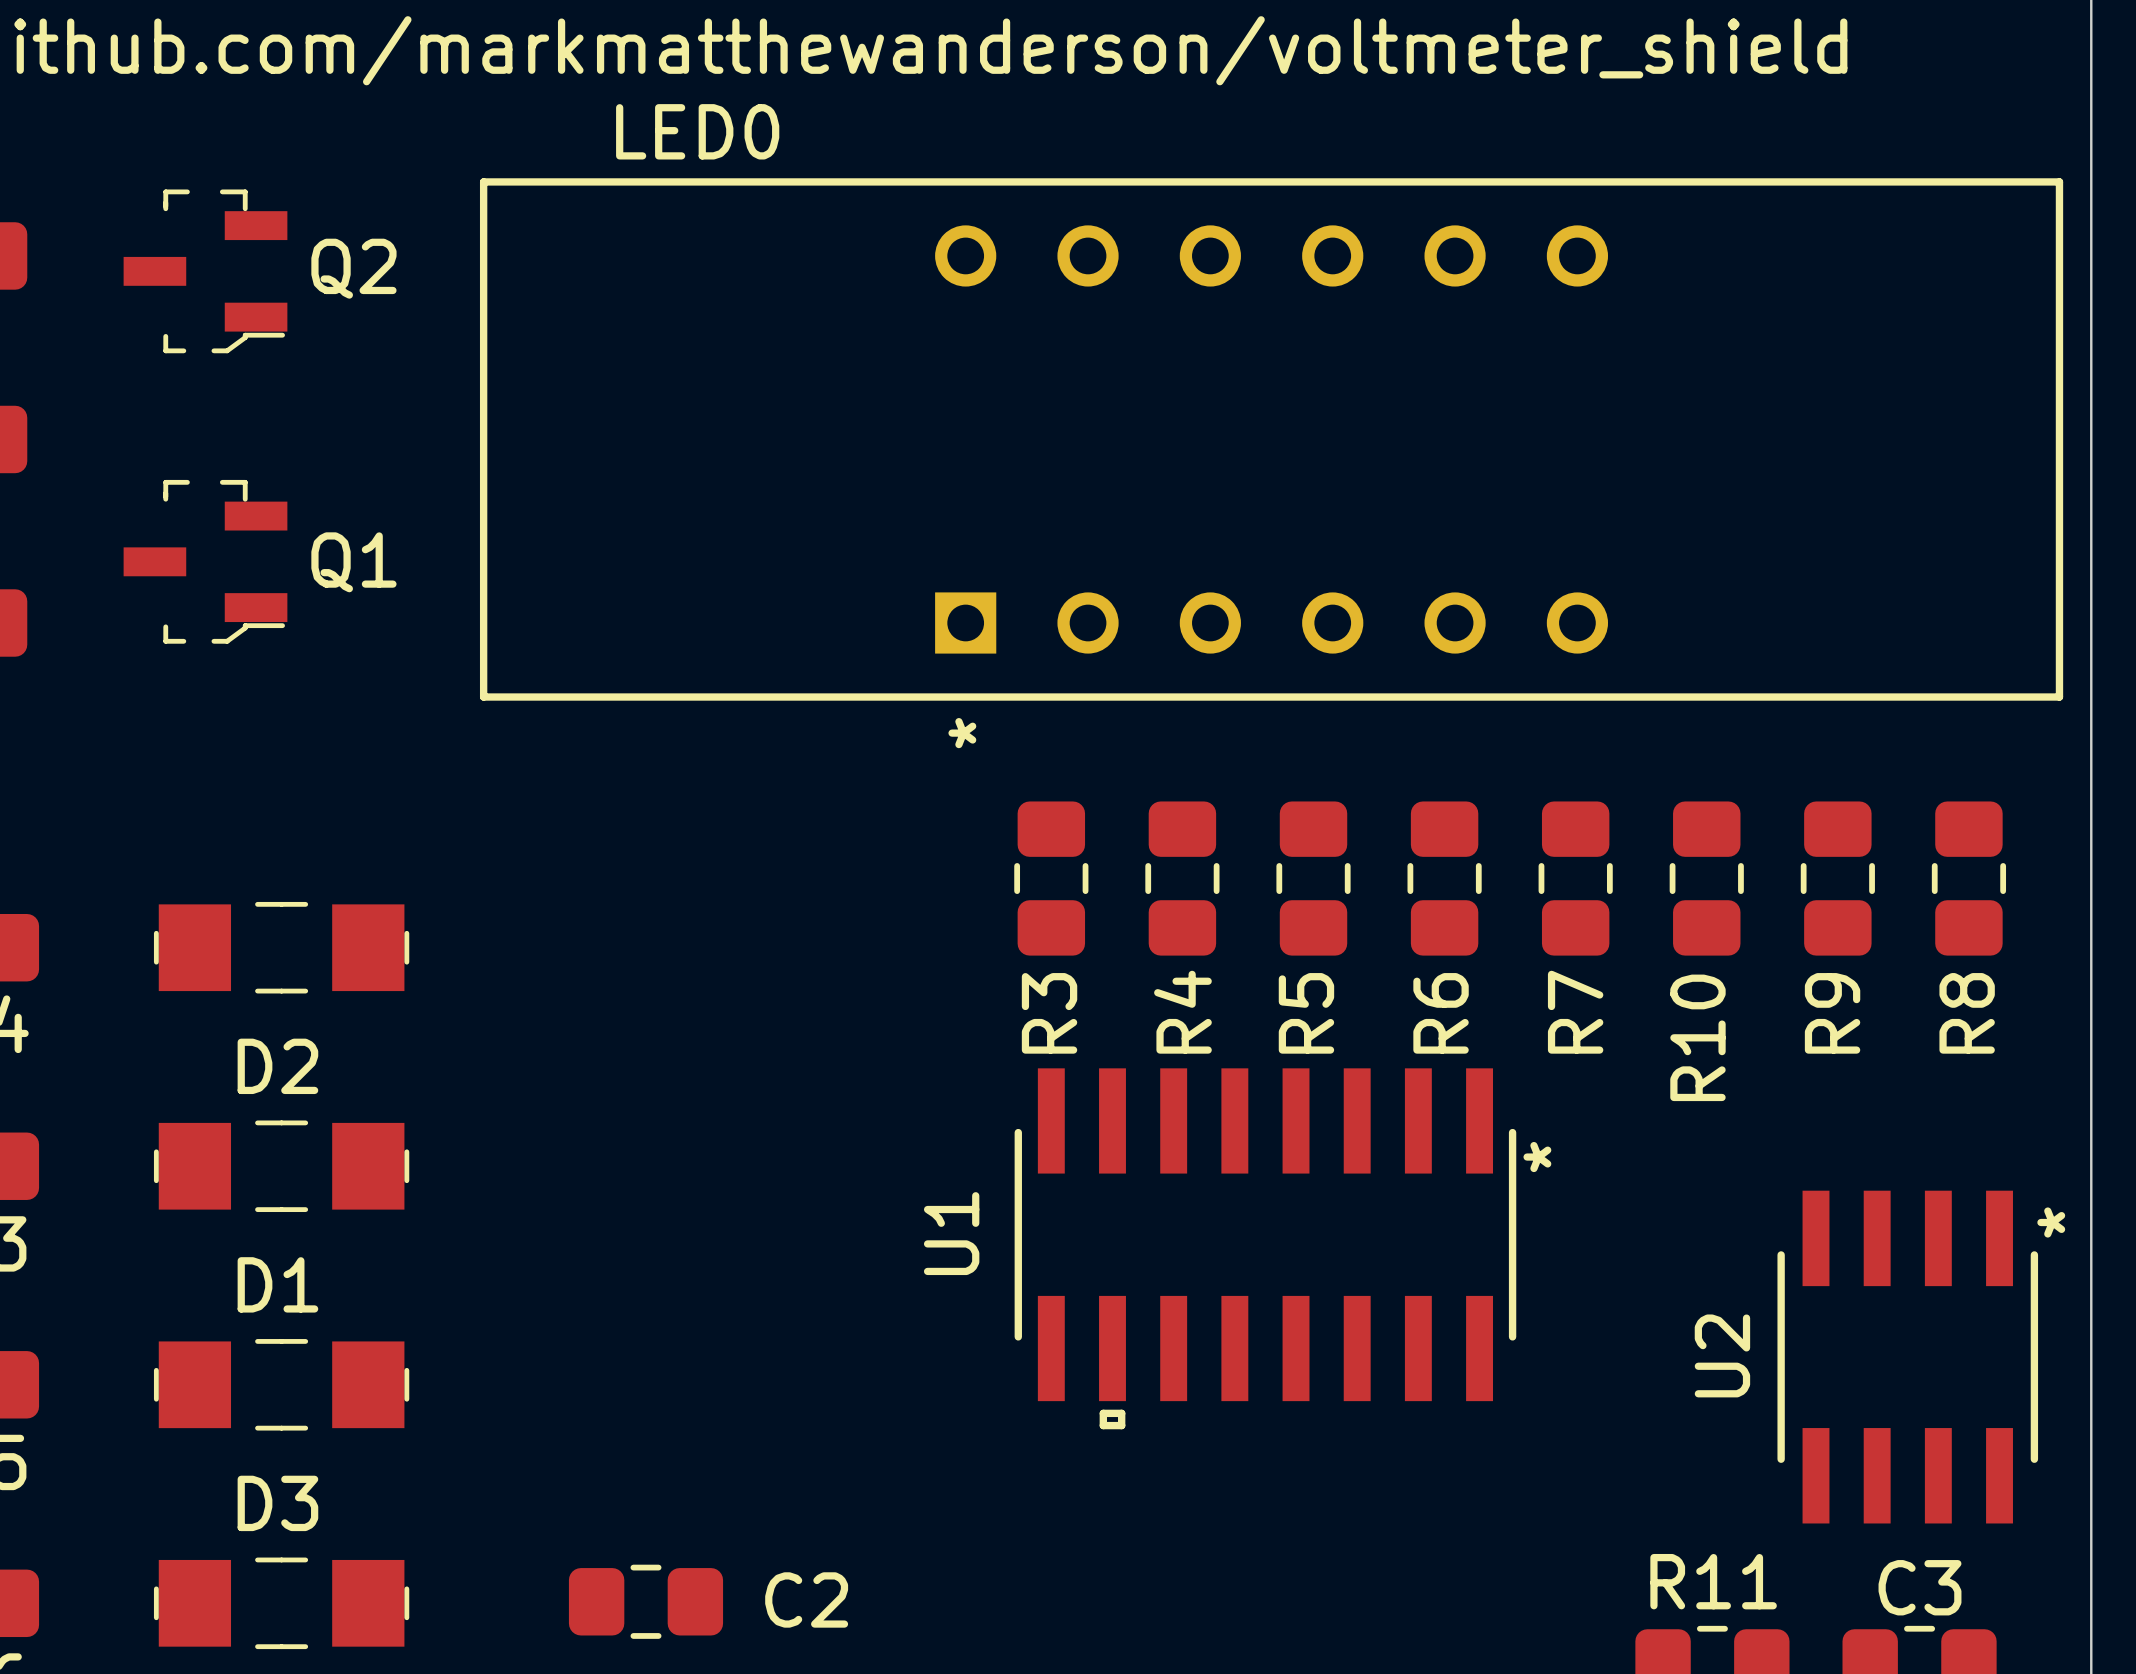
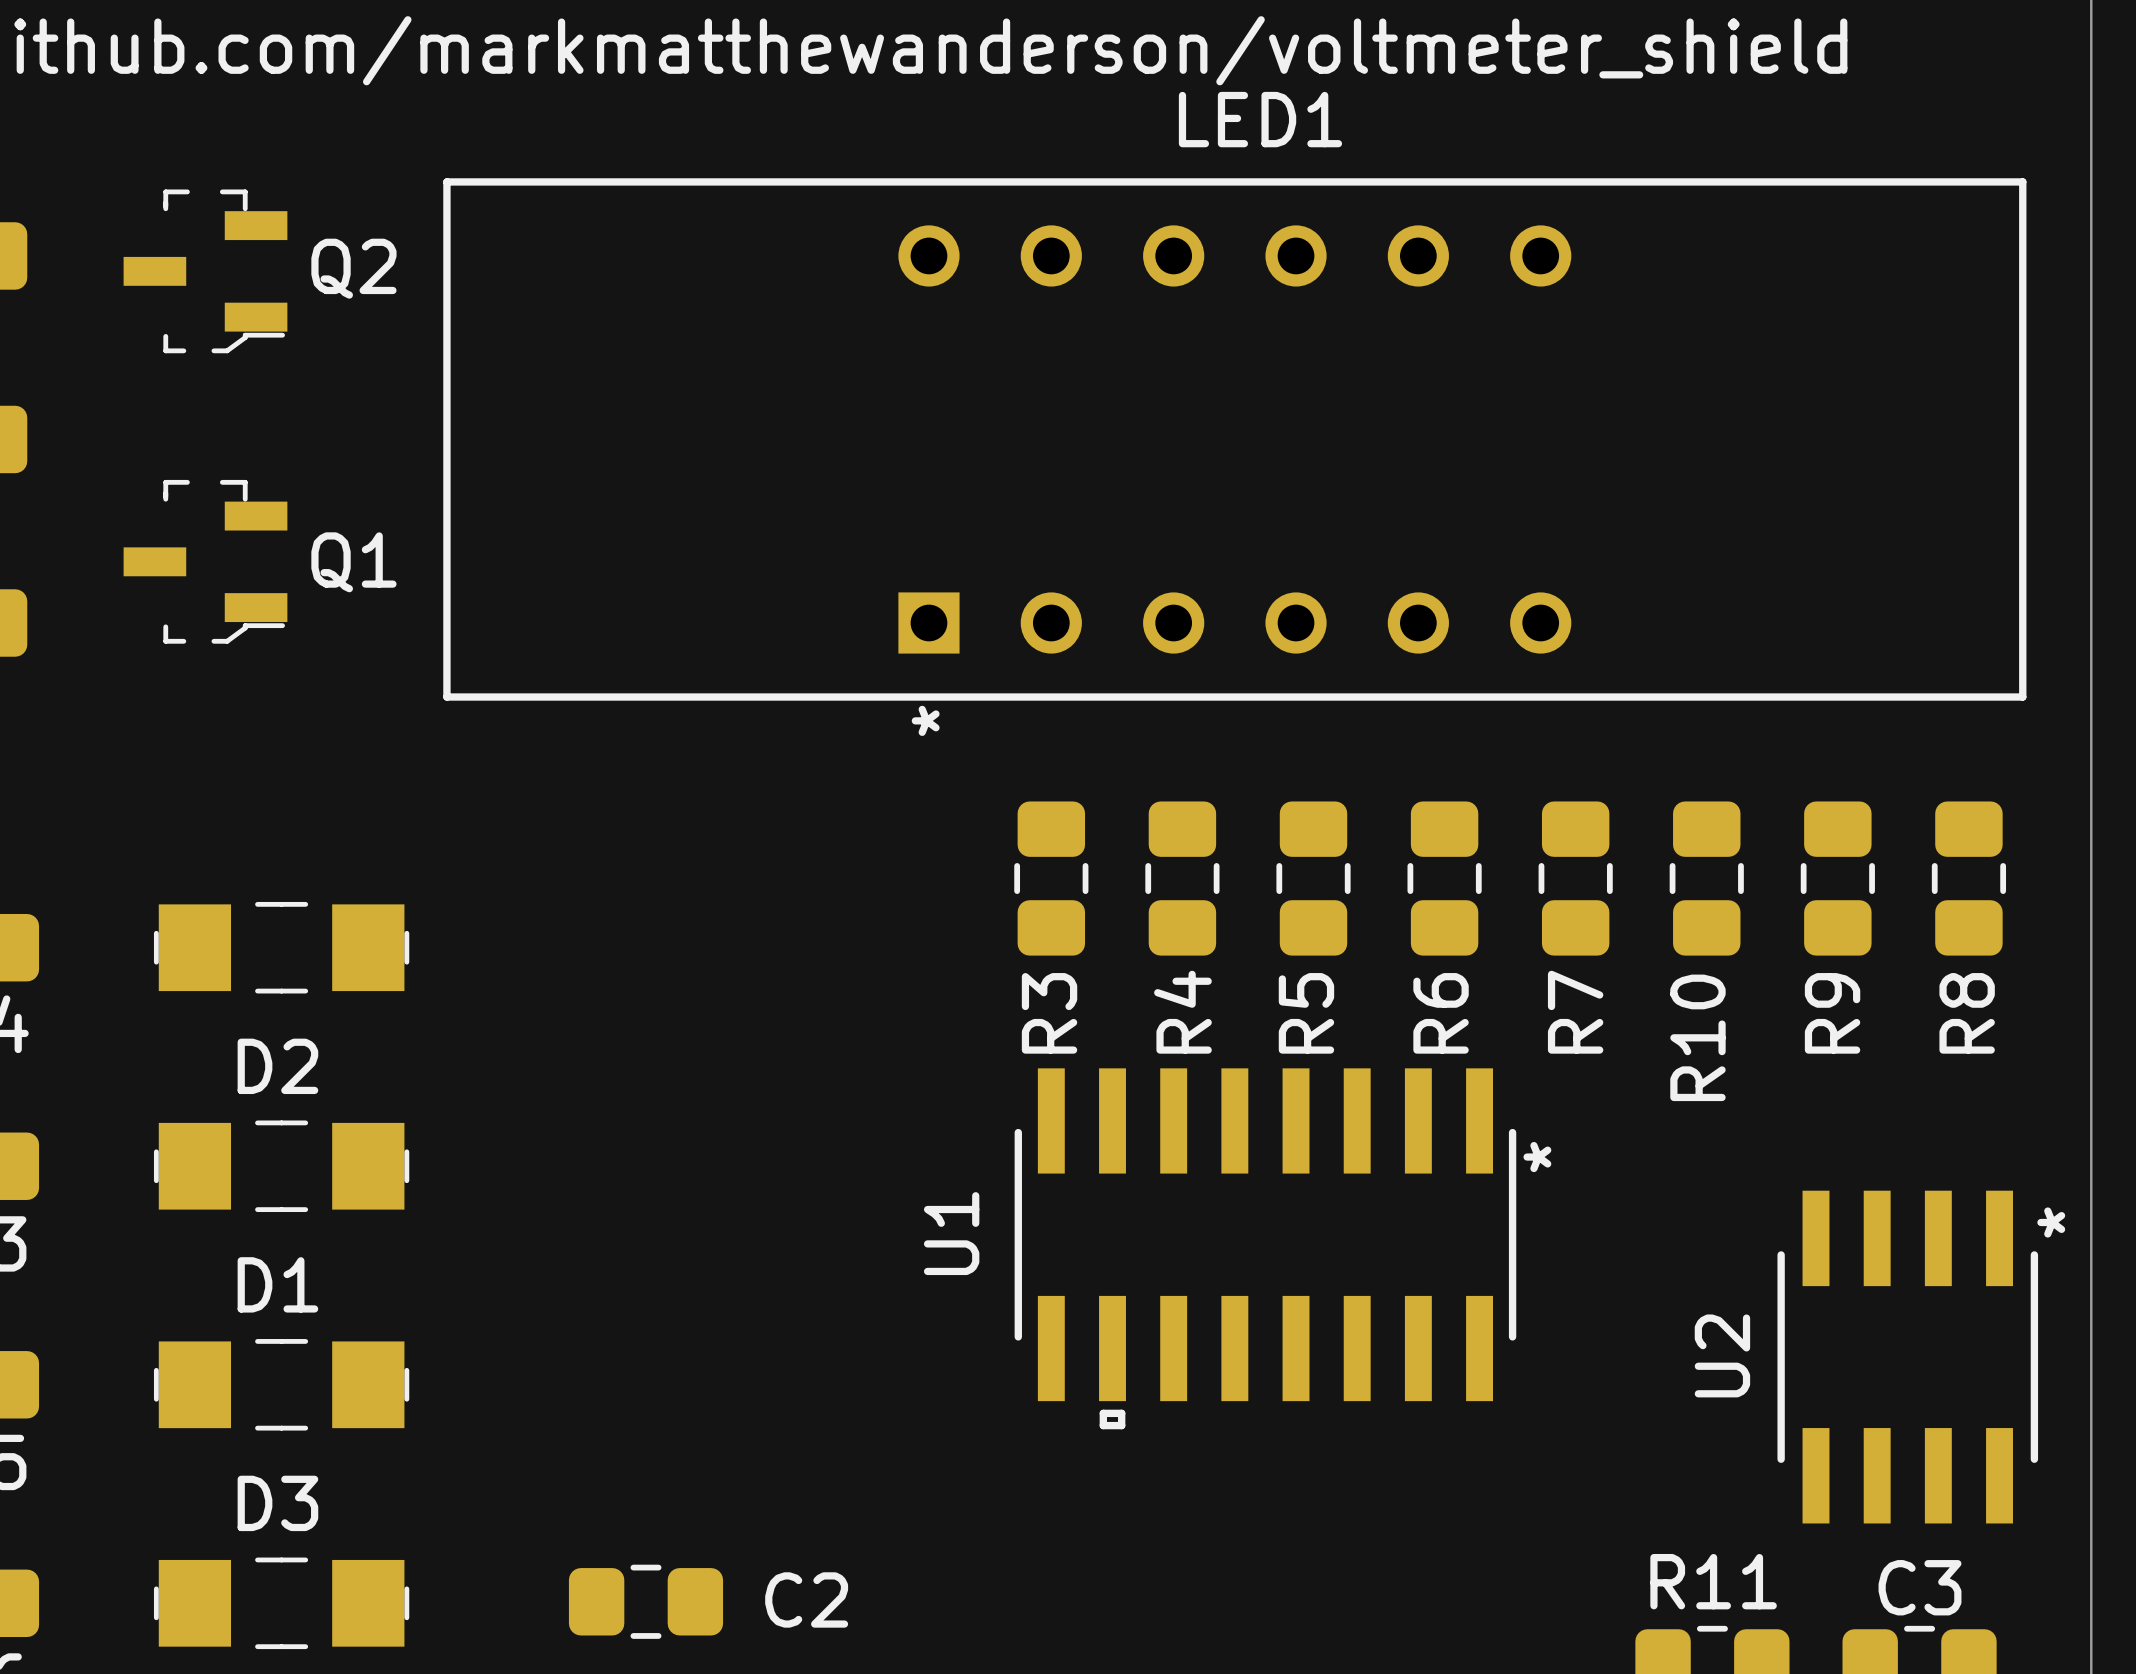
LED0 name: LED0 (697, 131) -> LED1 (1260, 119)
LED0 position: (1271, 439) -> (1234, 439)
LED0 text position: * (962, 733) -> * (925, 720)

